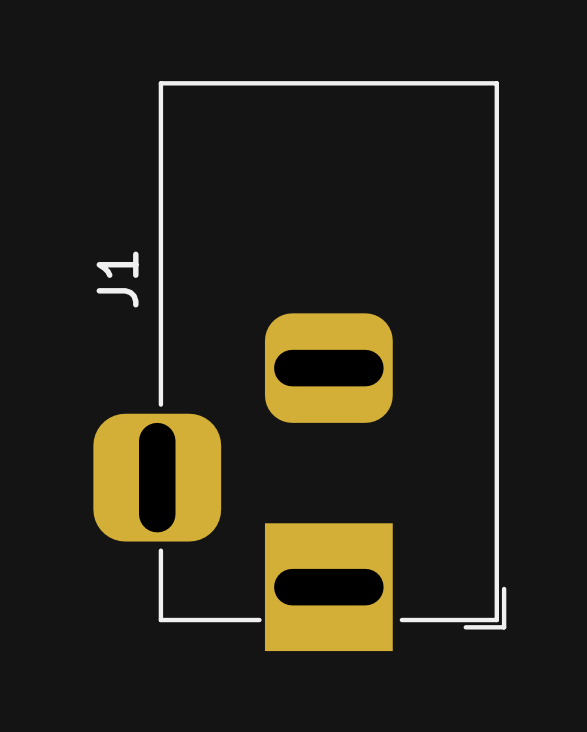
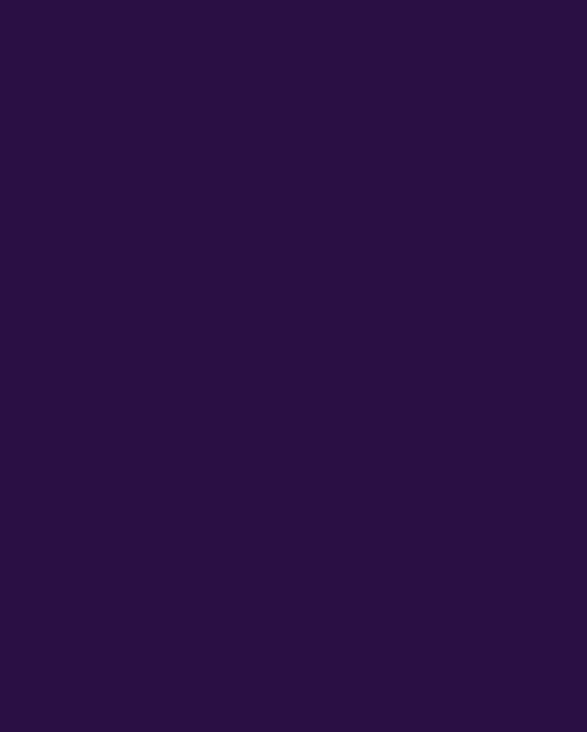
J1: (299, 366) -> none

